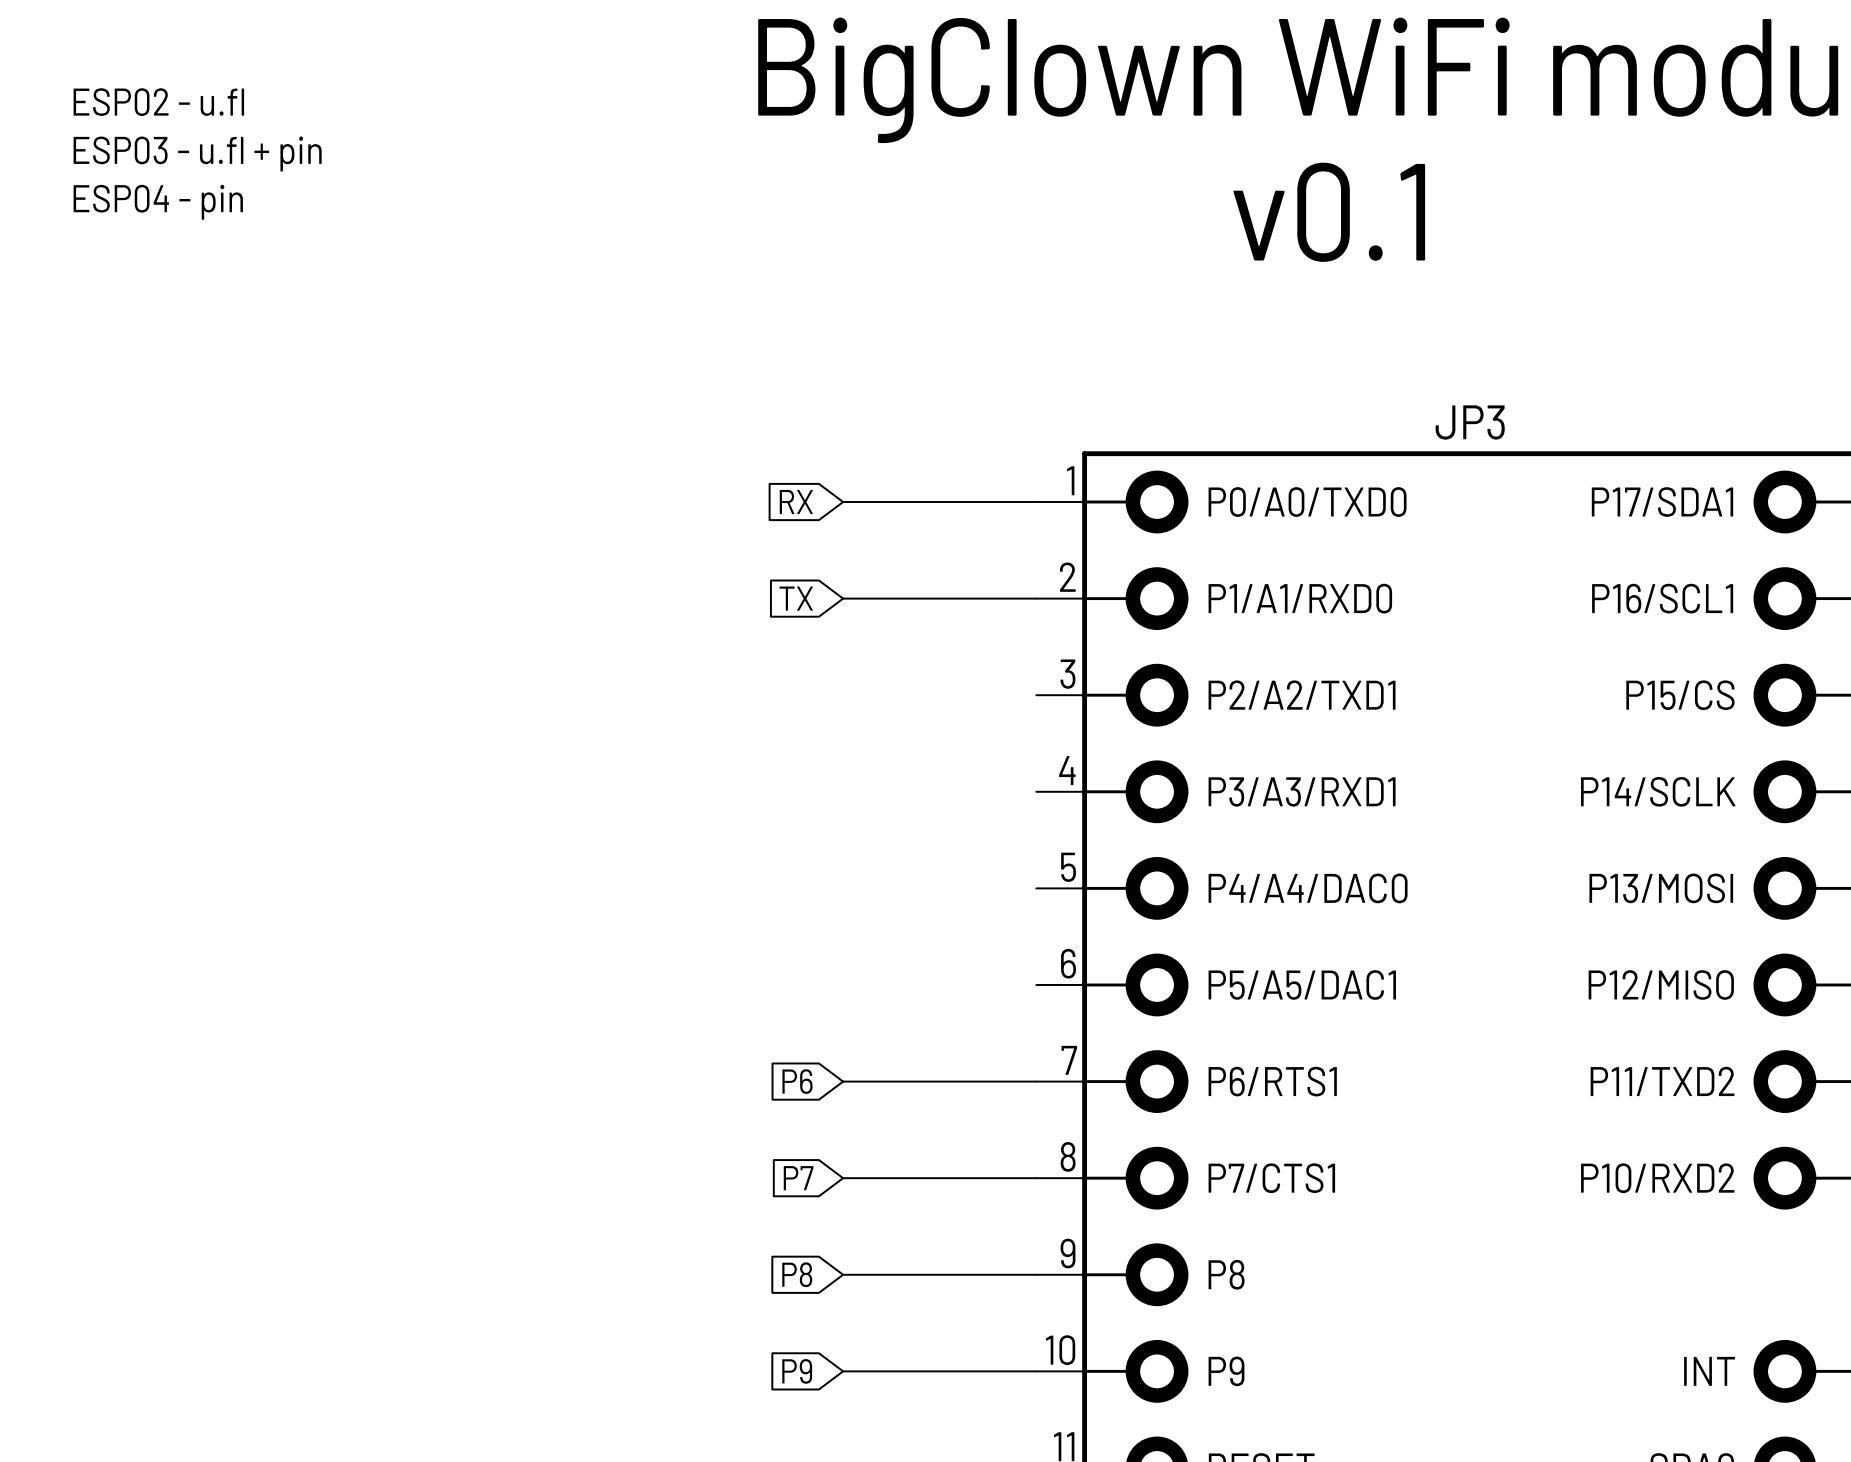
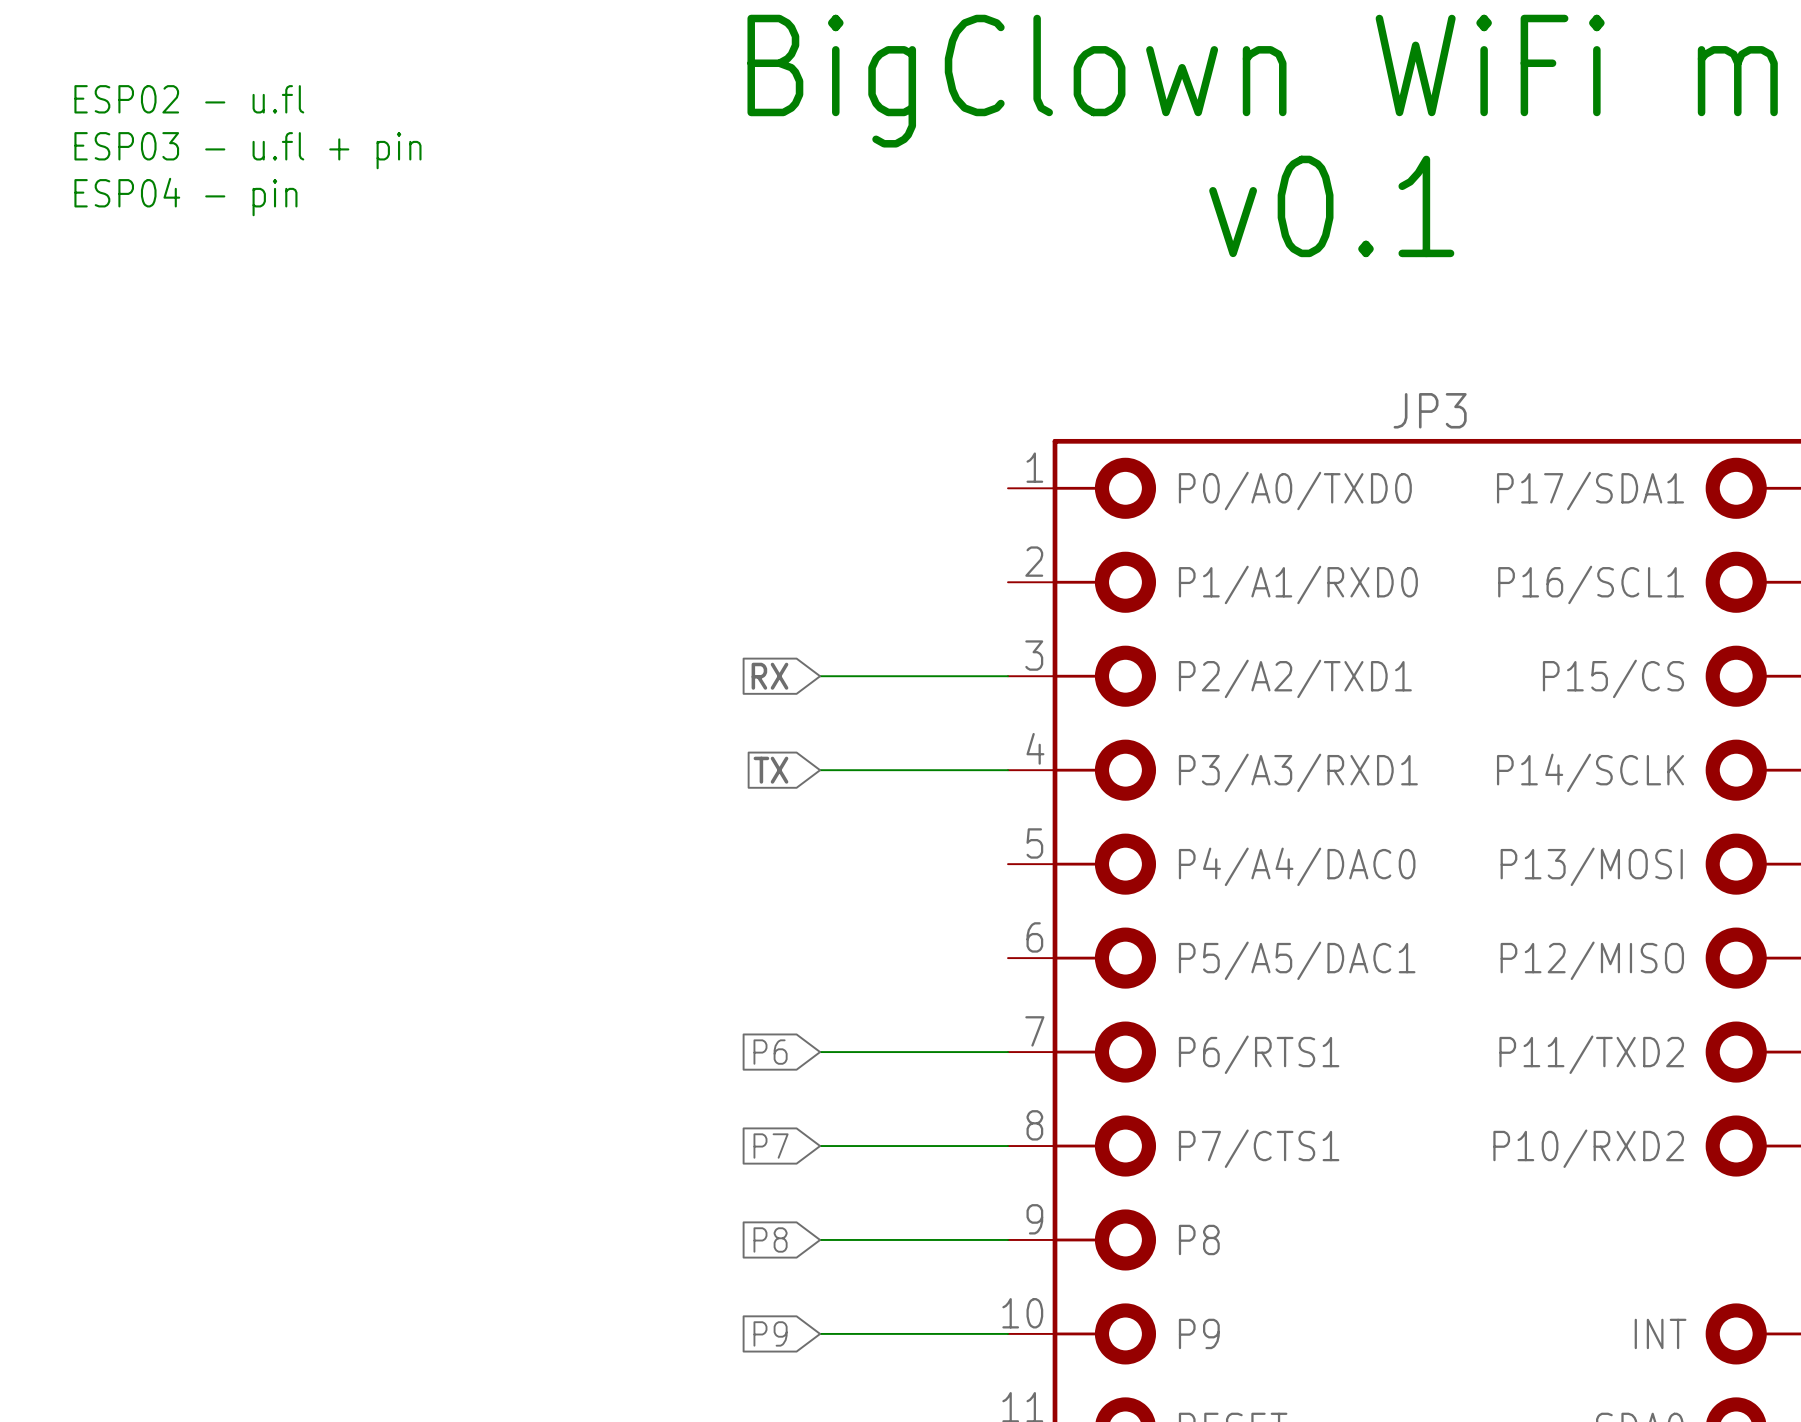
global label position: RX (796, 502) -> RX (769, 676)
wire: (843, 502) (1036, 502) -> (820, 770) (1008, 770)
global label position: TX (796, 598) -> TX (770, 770)
wire: (843, 598) (1036, 598) -> (820, 676) (1008, 676)

